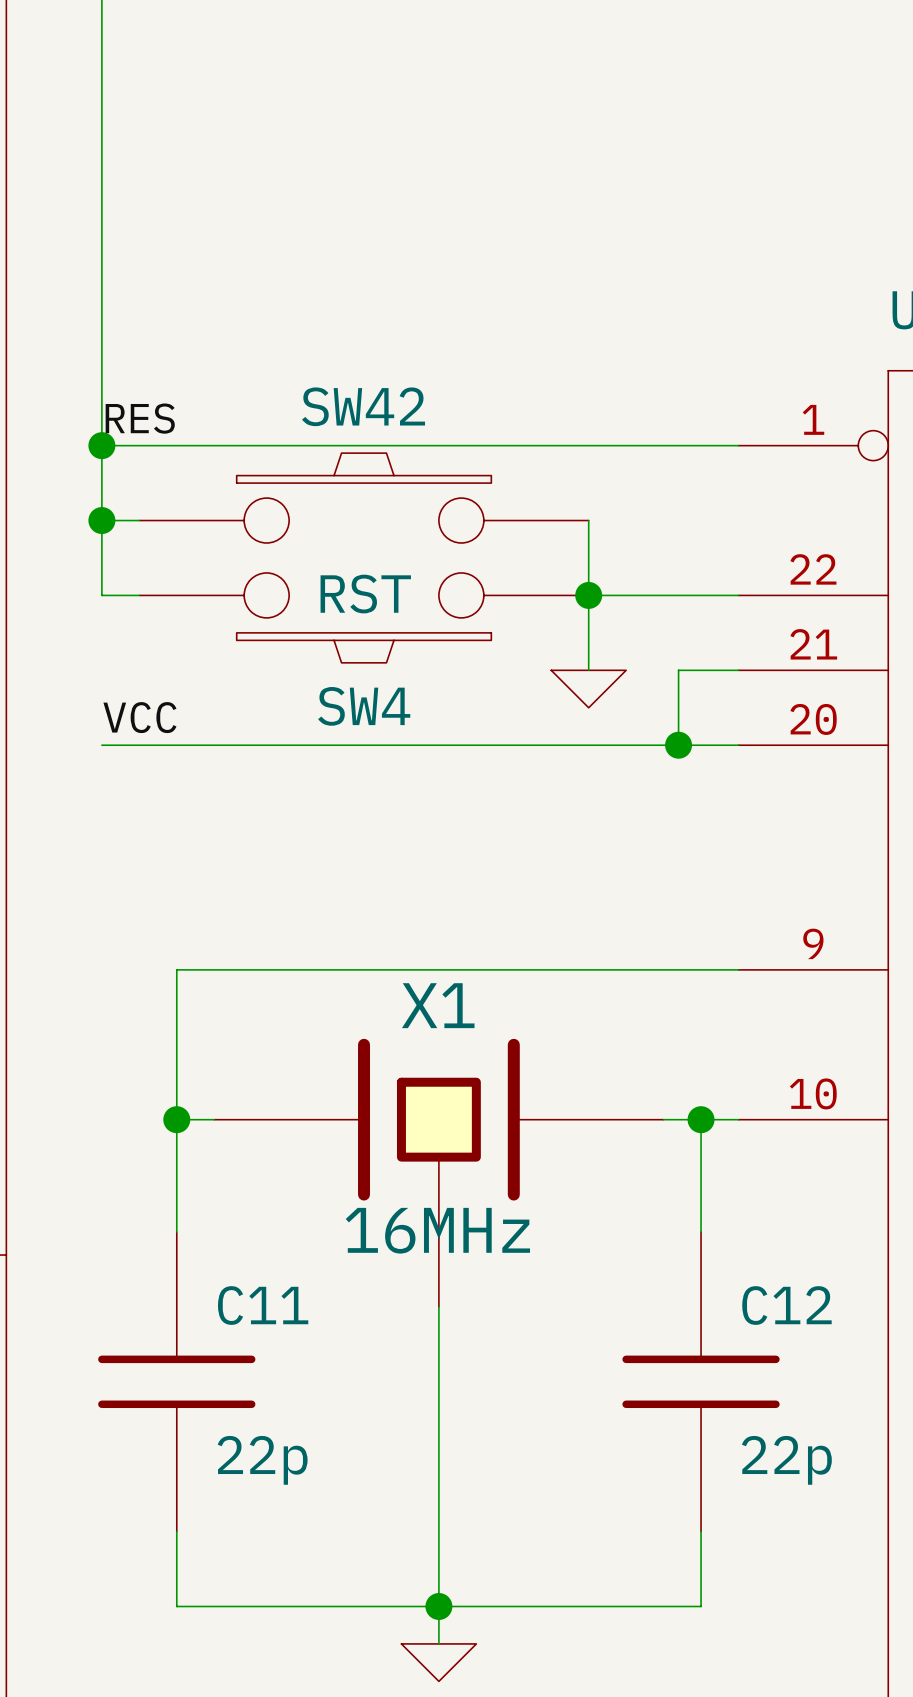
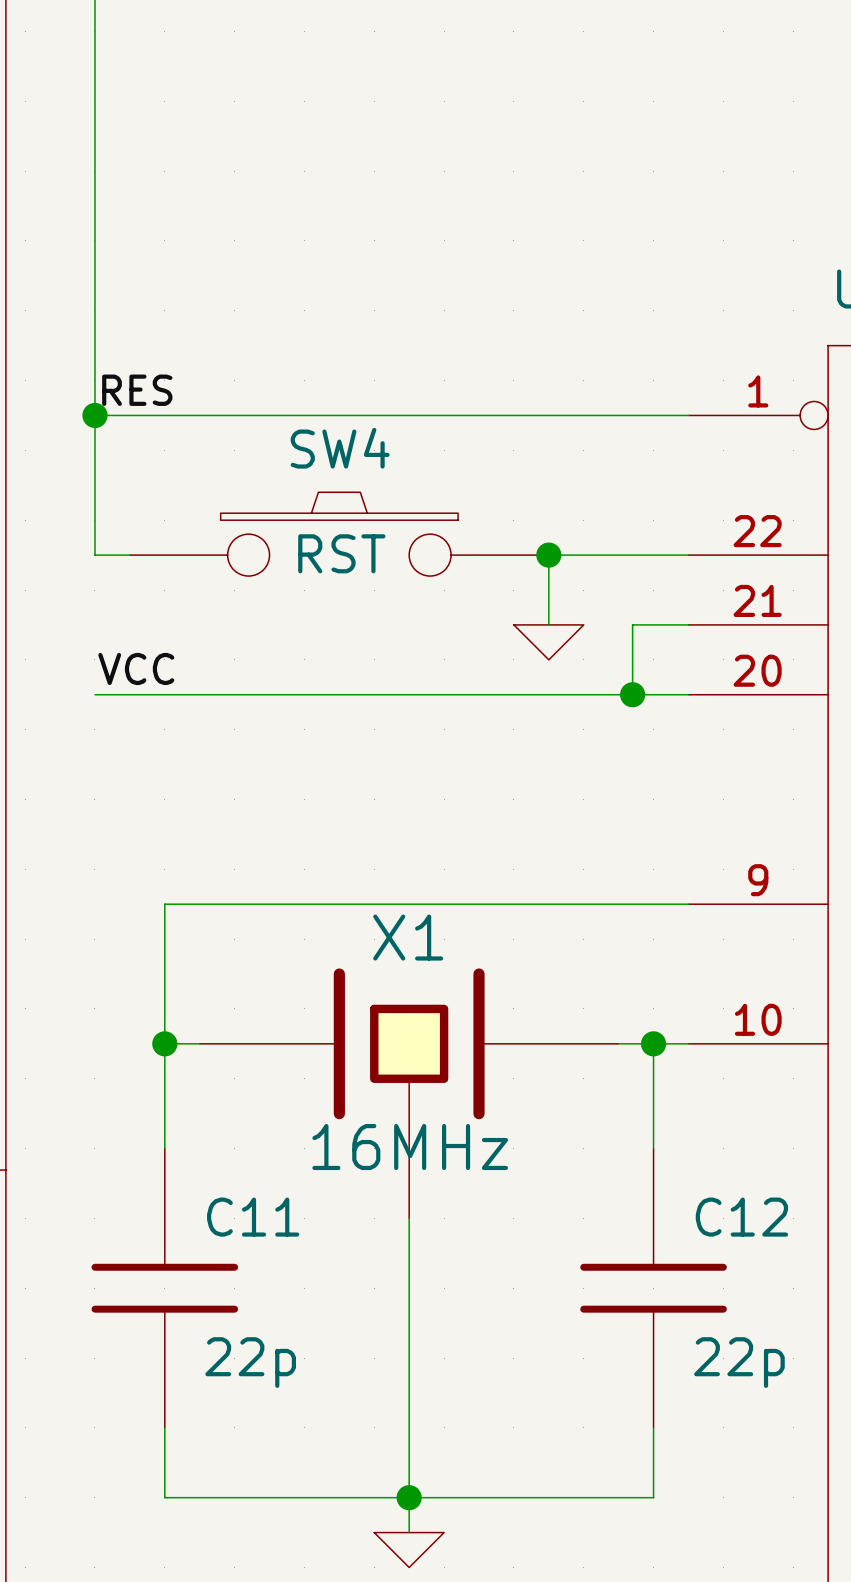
SW42: (364, 498) -> none
wire: (101, 520) (139, 520) -> none
junction: (101, 520) -> none
wire: (588, 520) (588, 595) -> none
SW4 rotation: 0° (364, 647) -> 180° (339, 506)

